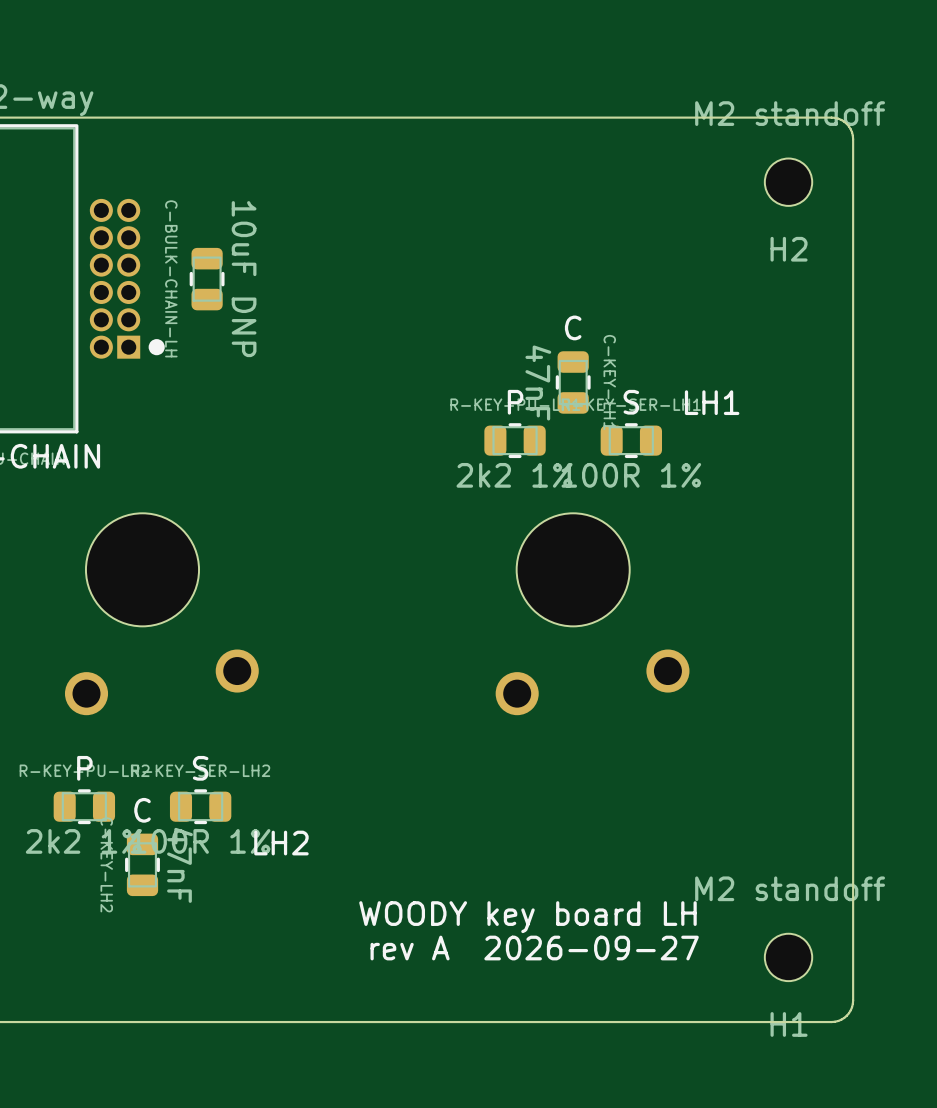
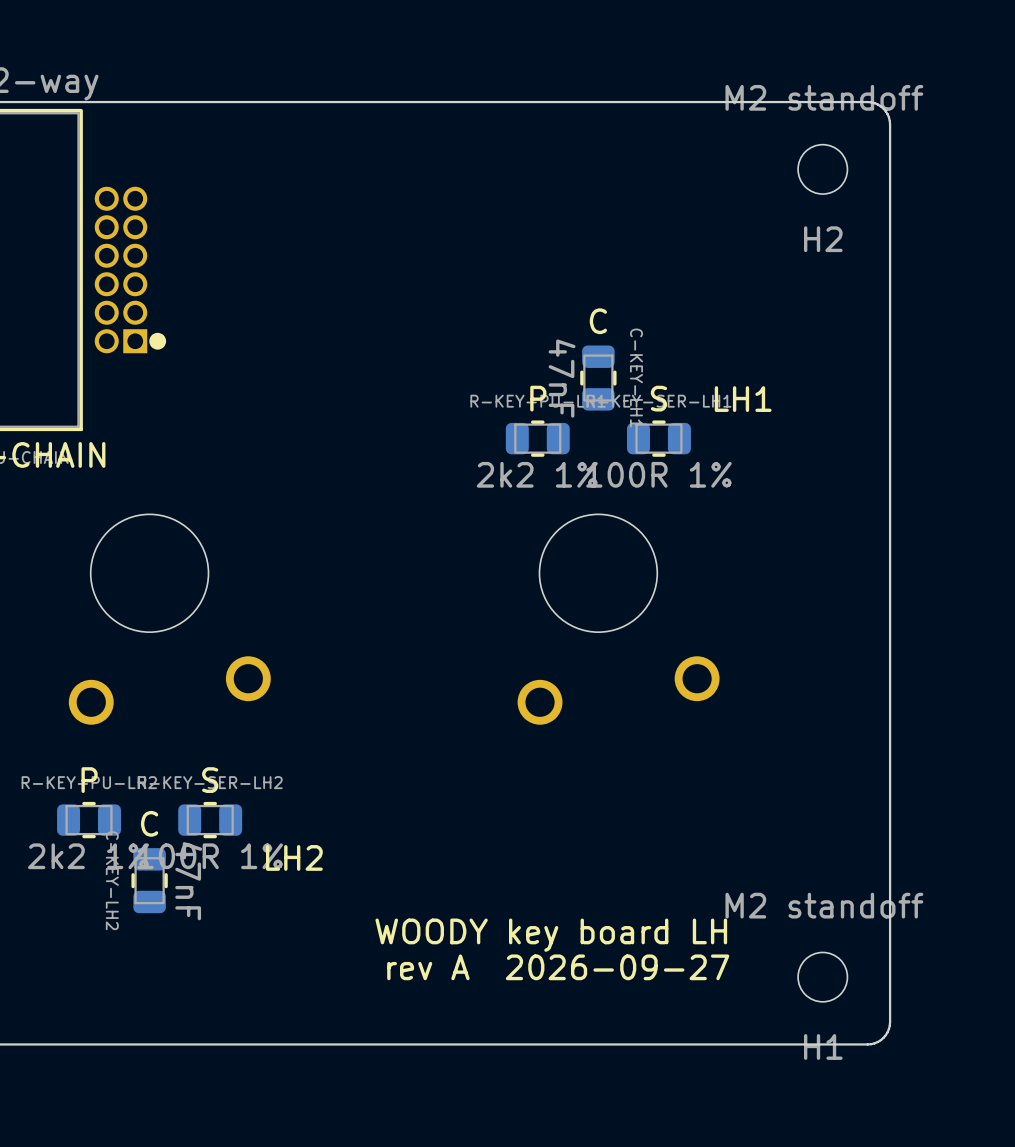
C-BULK-CHAIN-LH: 10uF DNP (207, 279) -> none
drawing shape: [148, 339, 165, 356] -> [149, 332, 167, 350]

